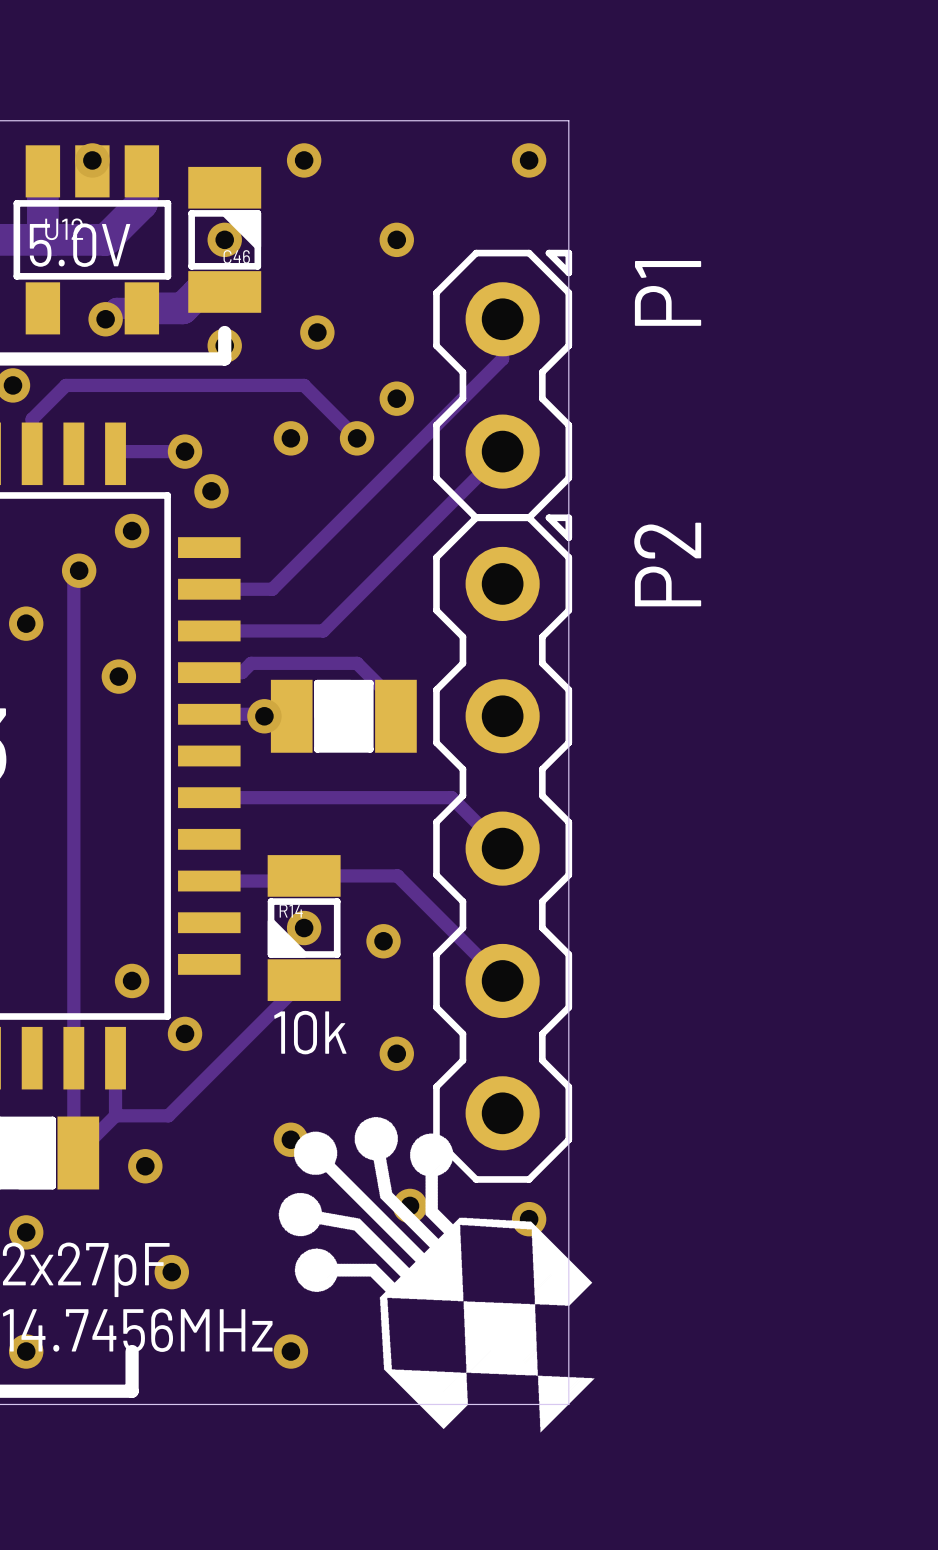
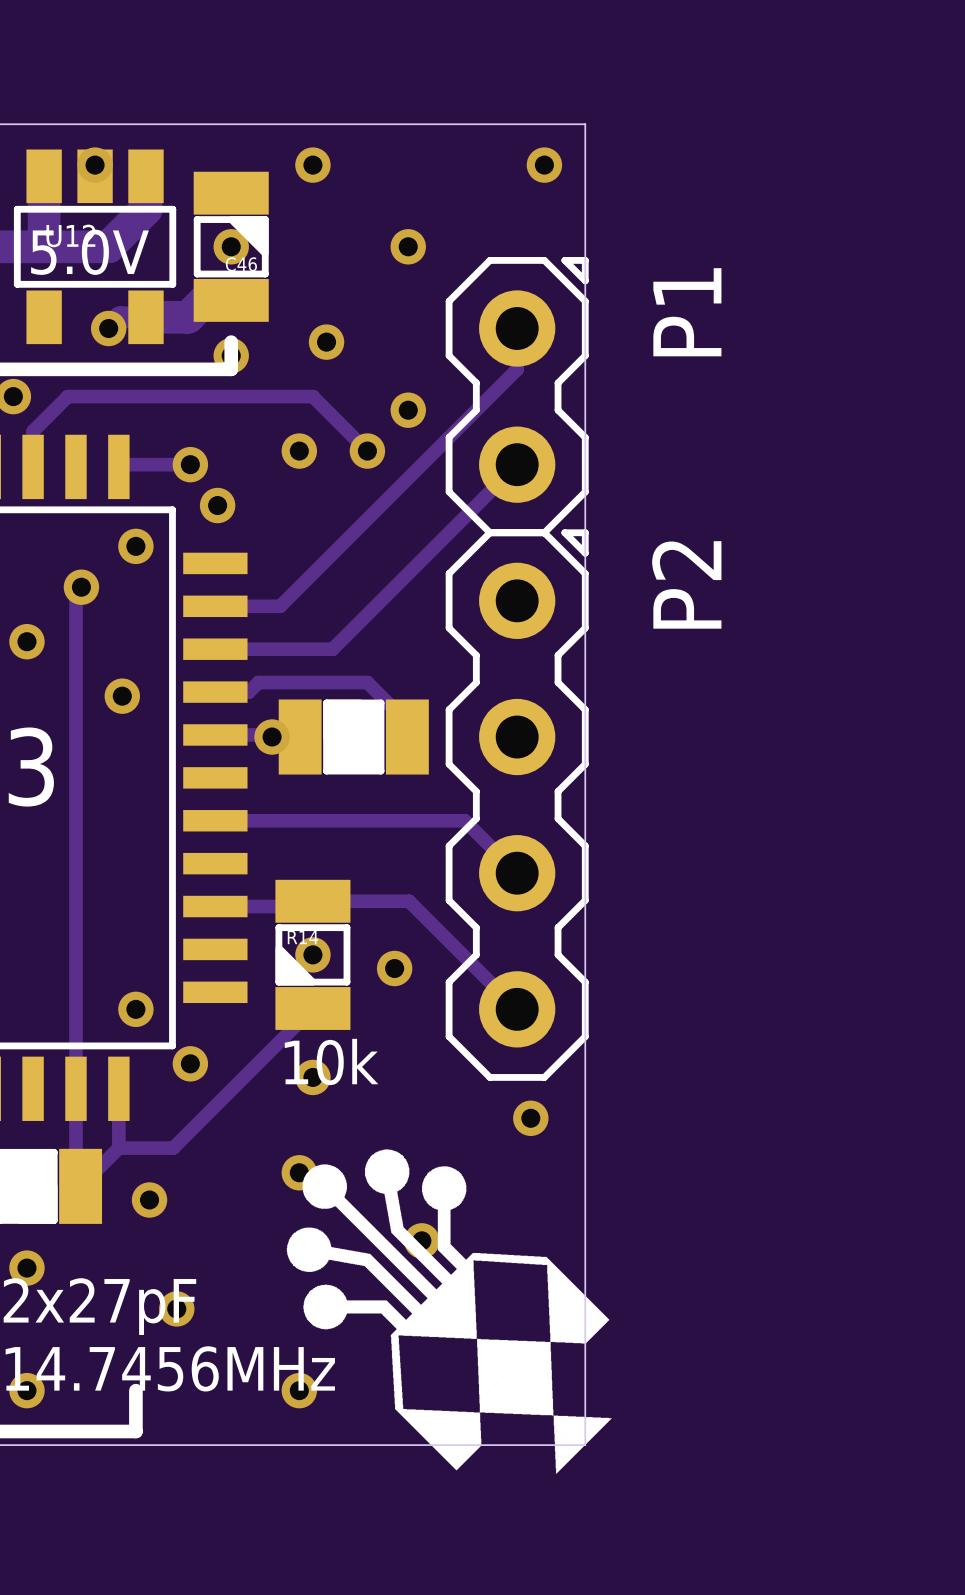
P2 footprint: [433, 514, 573, 1183] -> [445, 529, 589, 1081]
via: none -> (312, 1077)
via: (396, 1053) -> none
via: none -> (530, 1118)
via: (529, 1219) -> none

